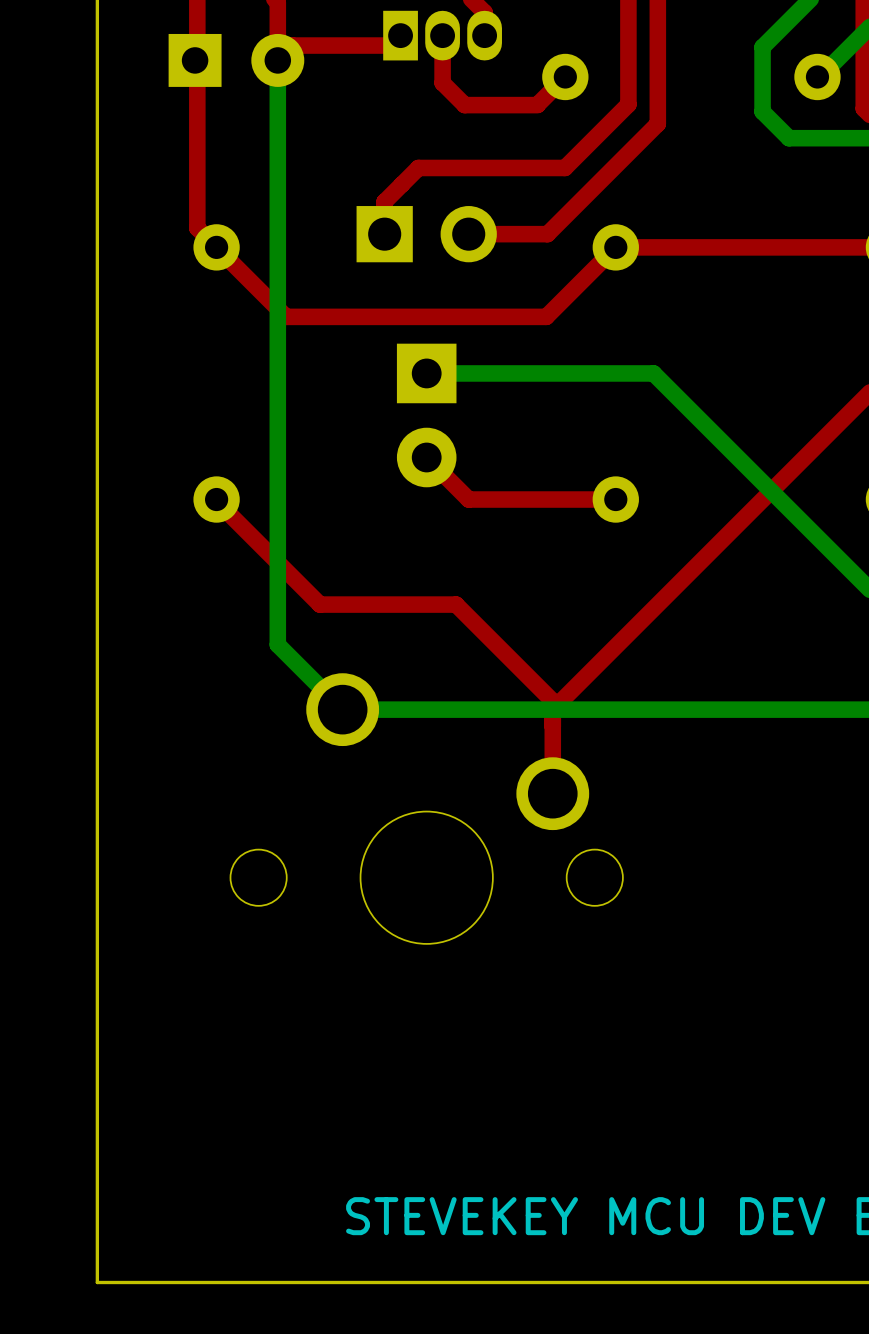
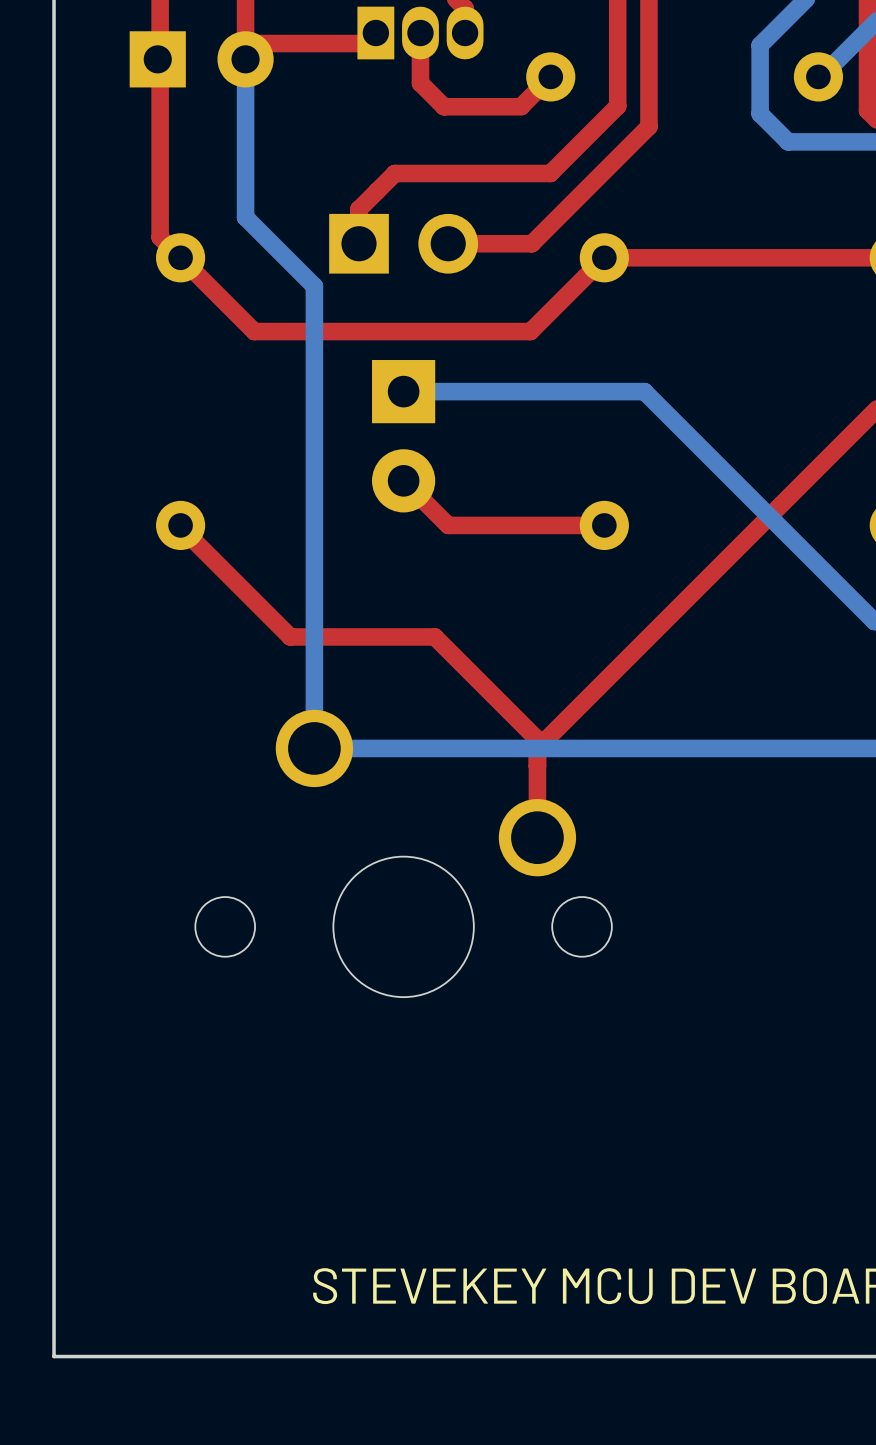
bottom track: (277, 209) (277, 644) (342, 709) -> (245, 217) (314, 286) (314, 748)

